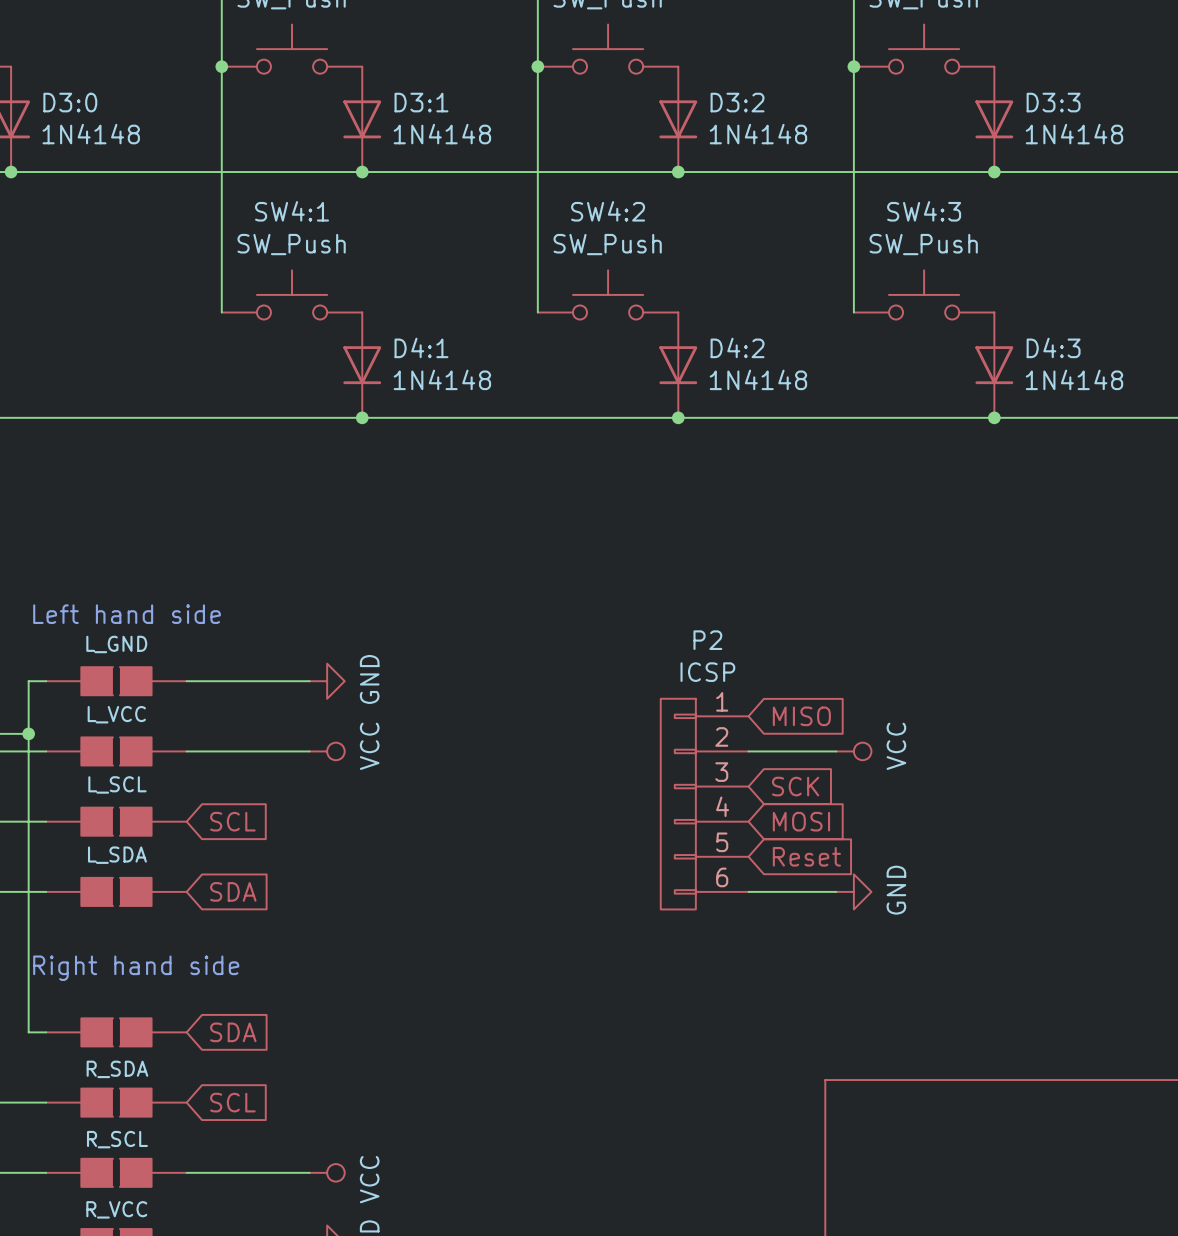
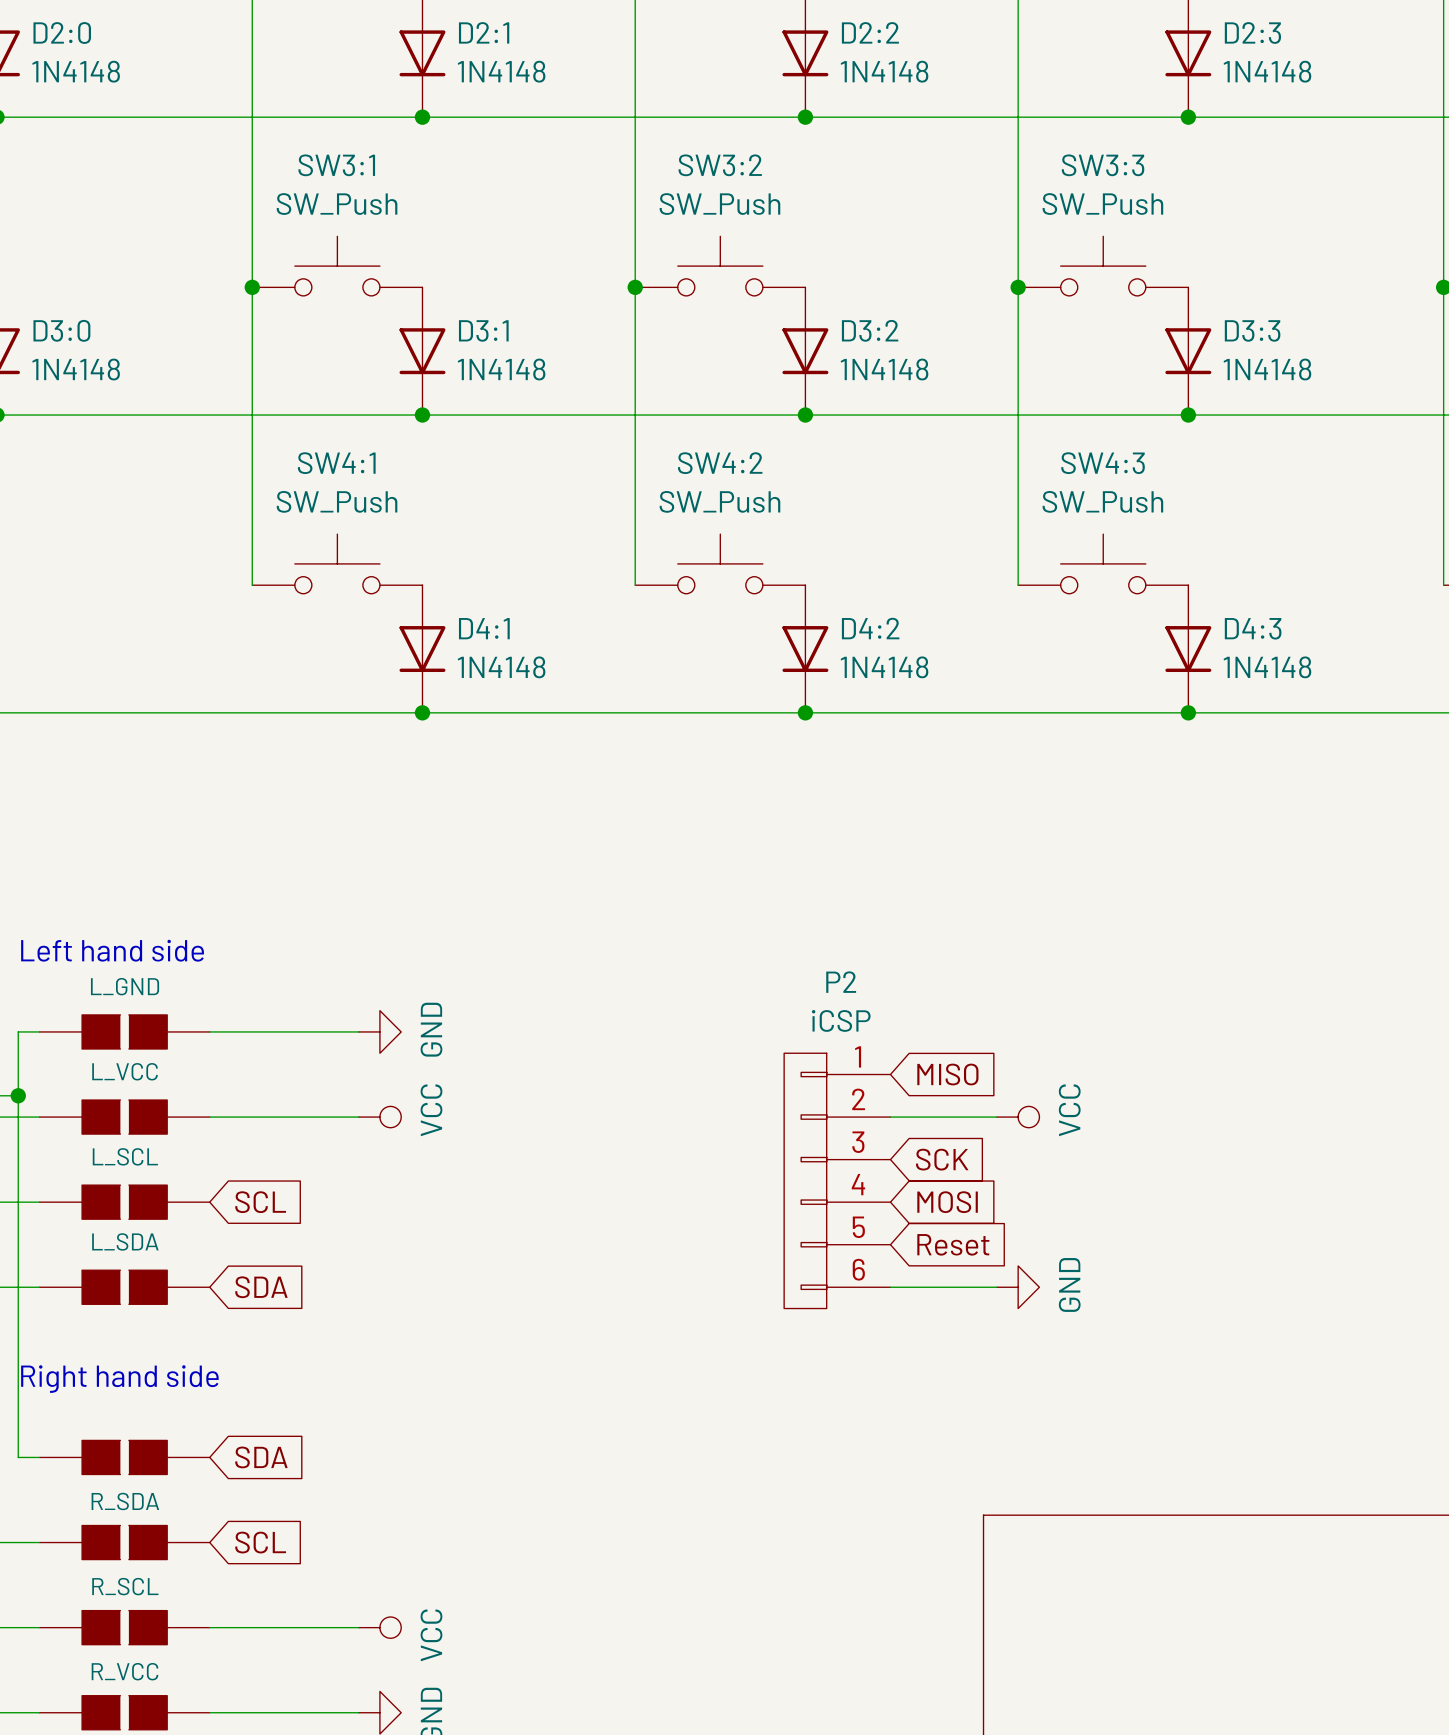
P2 value: ICSP (707, 672) -> iCSP (841, 1020)

